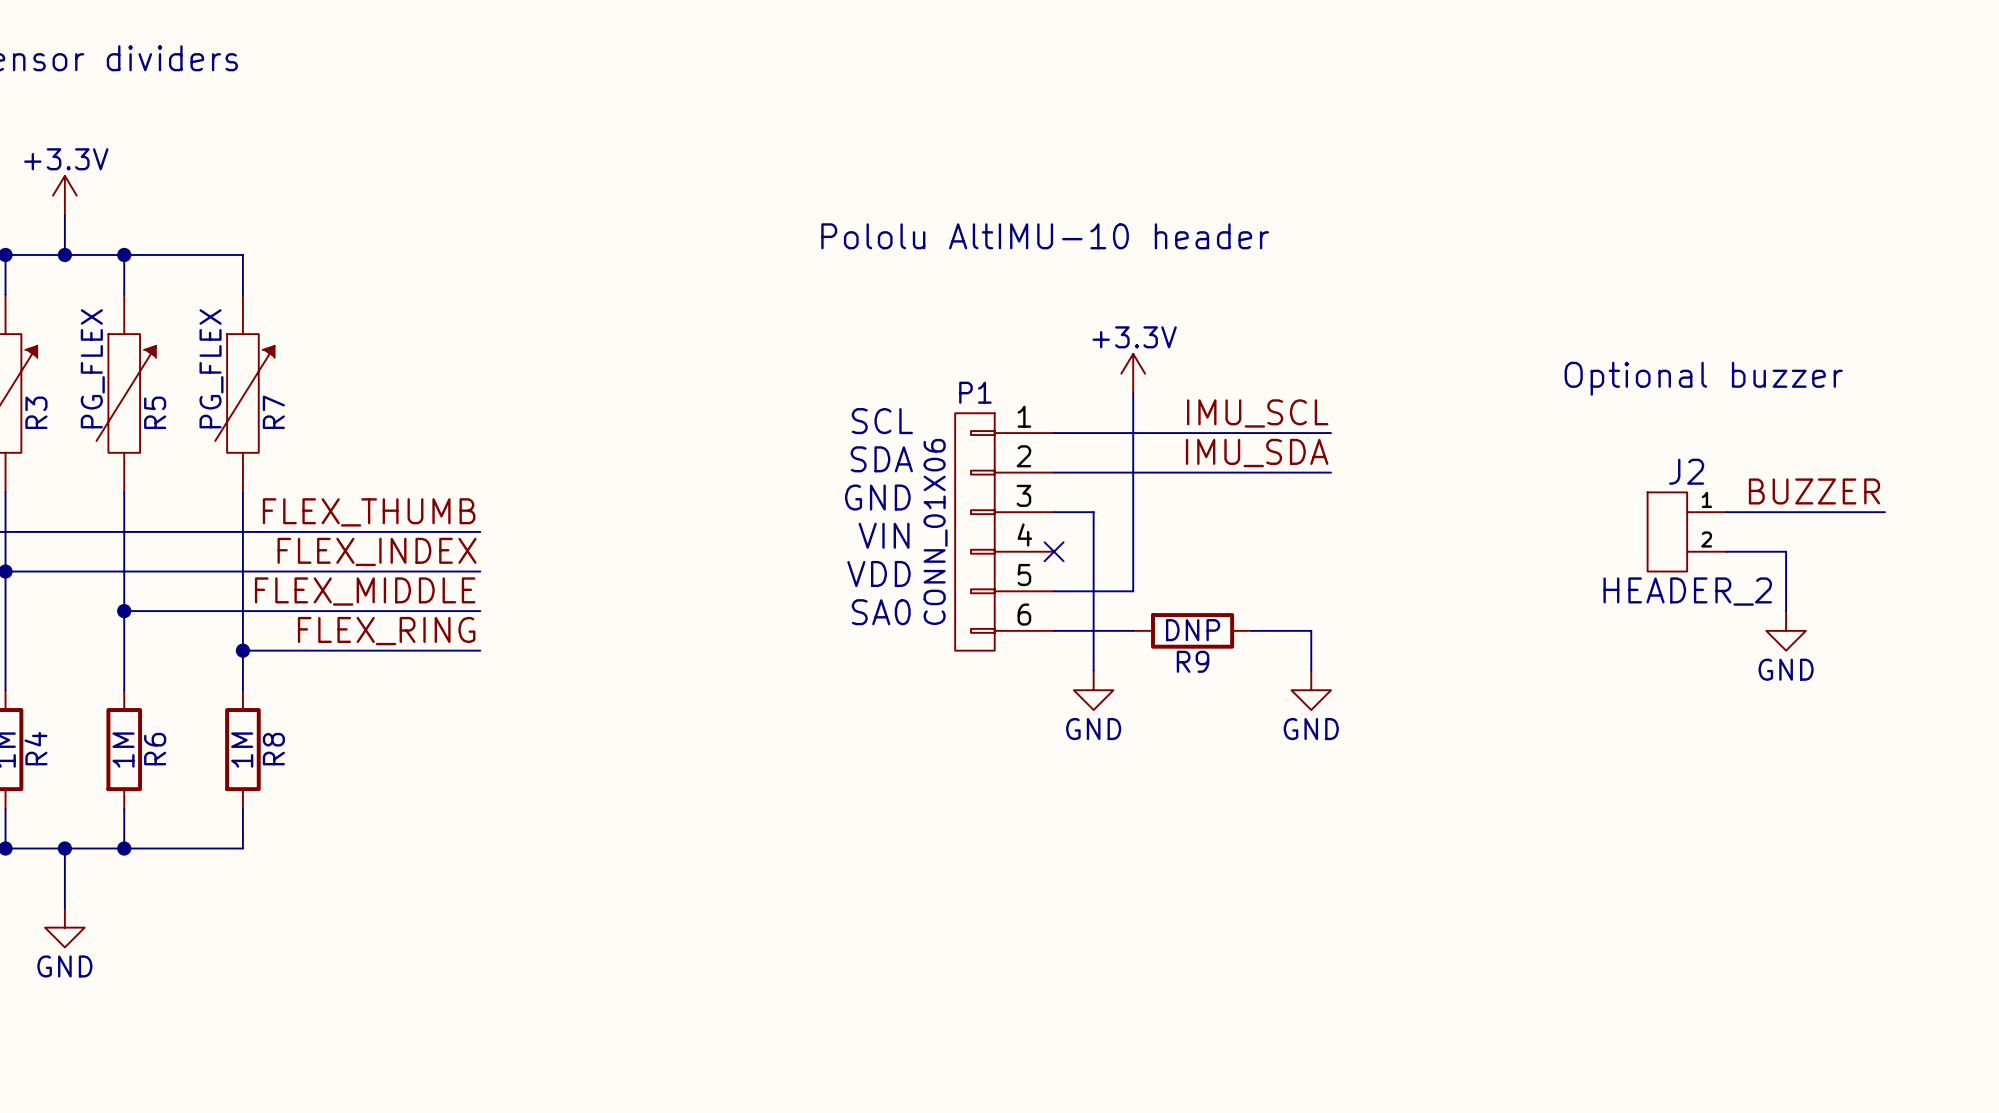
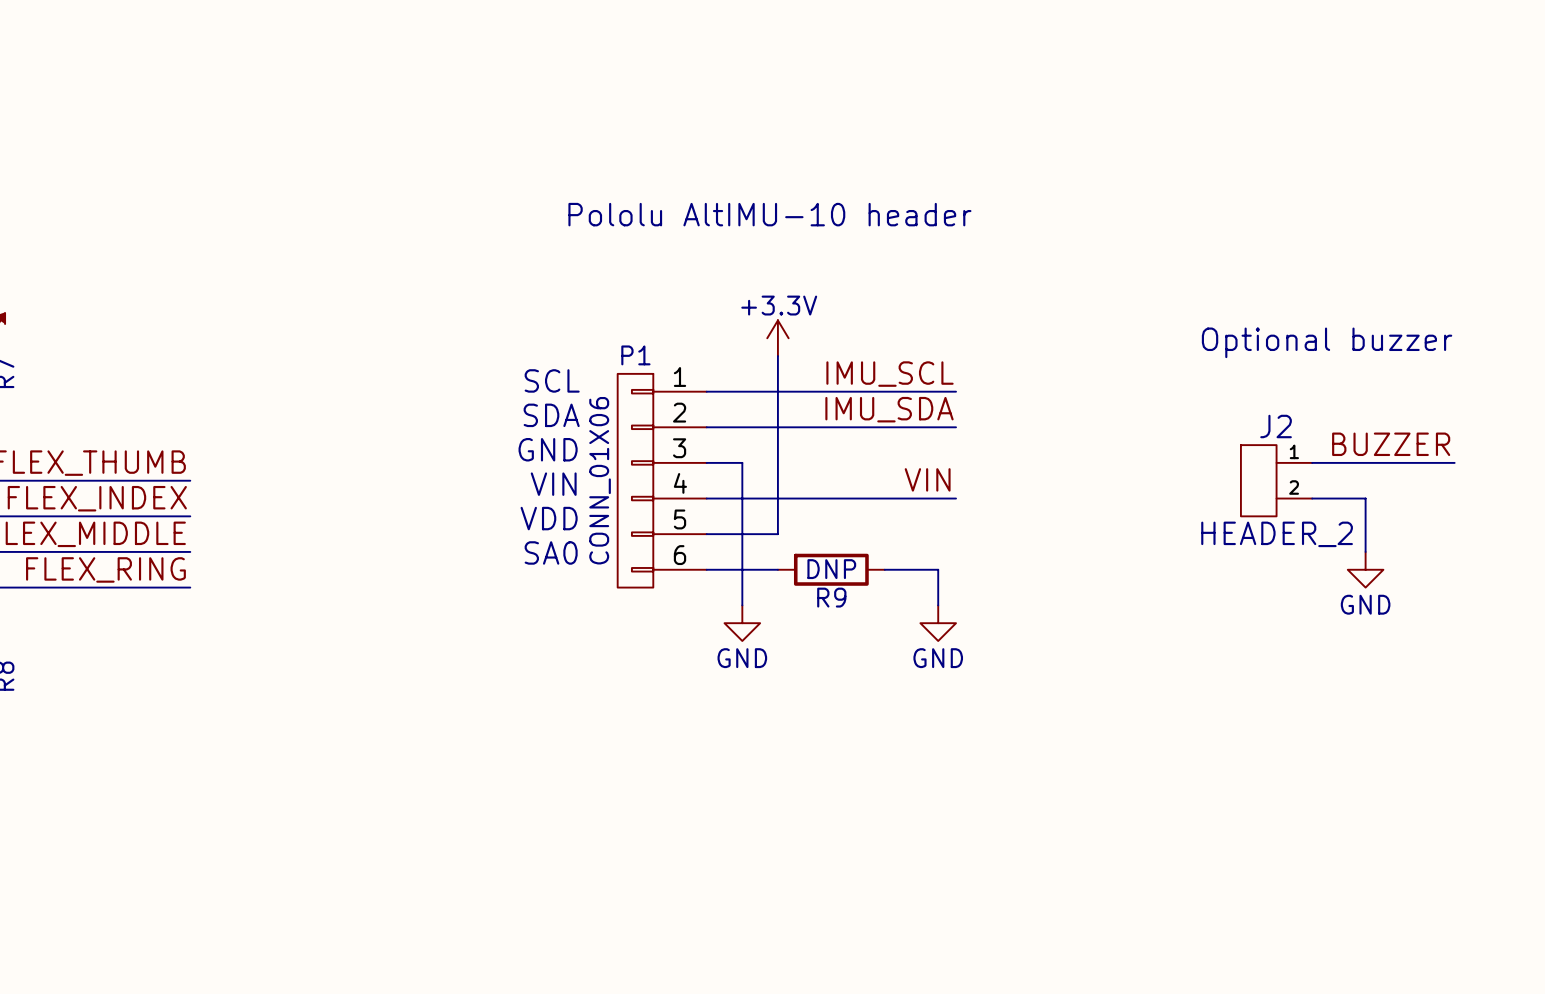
text position: Pololu AltIMU-10 header (1045, 236) -> Pololu AltIMU-10 header (769, 214)
text position: Optional buzzer (1703, 378) -> Optional buzzer (1327, 342)
label: none -> VIN (927, 479)
wire: none -> (706, 498) (956, 498)
no-connect mark: (1054, 551) -> none

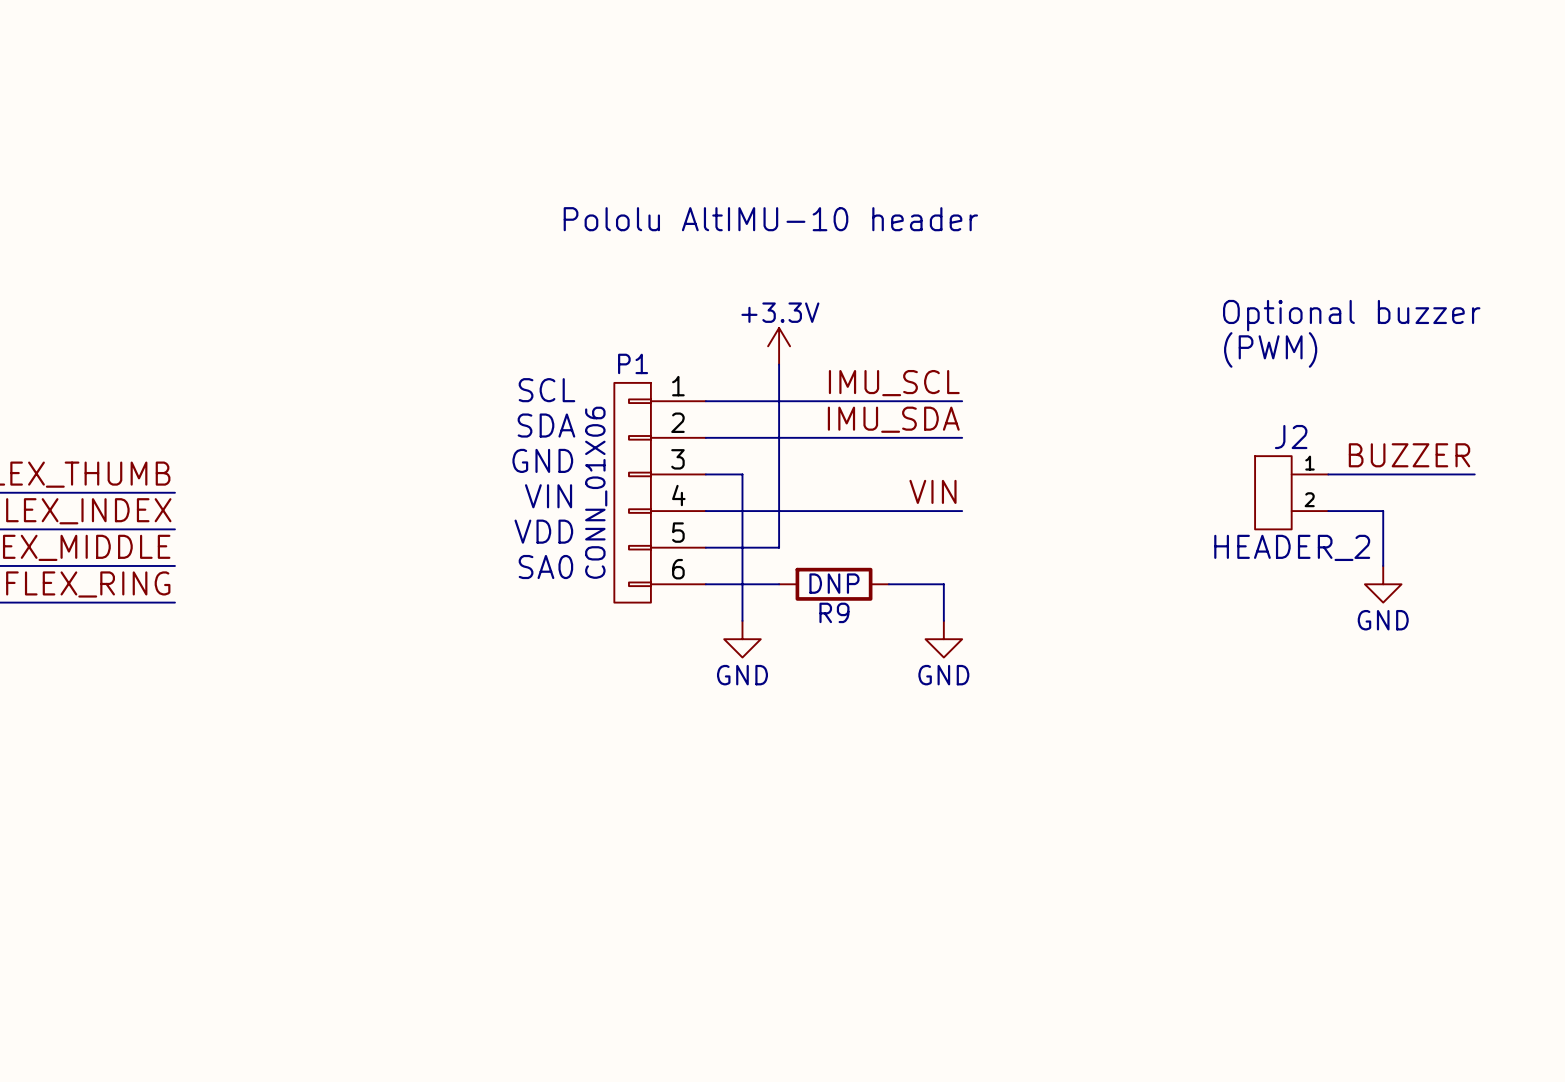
text: none -> (PWM) (1270, 349)
text position: Optional buzzer (1327, 342) -> Optional buzzer (1351, 315)

